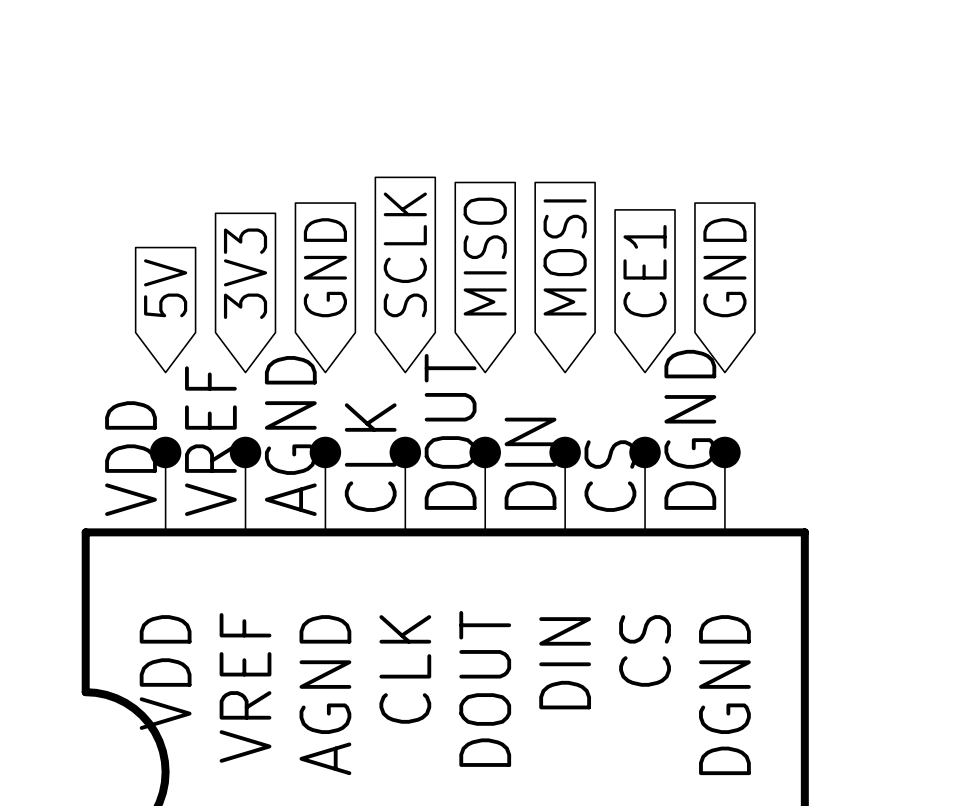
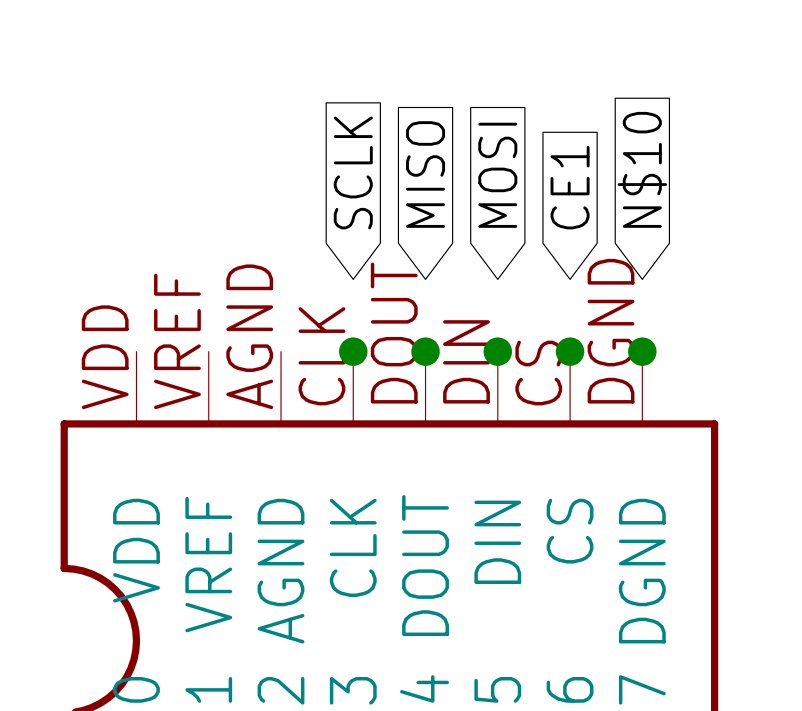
global label: GND (325, 267) -> none
global label: GND (724, 267) -> N$10 (642, 169)
global label: 3V3 (245, 273) -> none
global label: 5V (165, 288) -> none
junction: (165, 452) -> none
junction: (245, 452) -> none
junction: (325, 452) -> none

